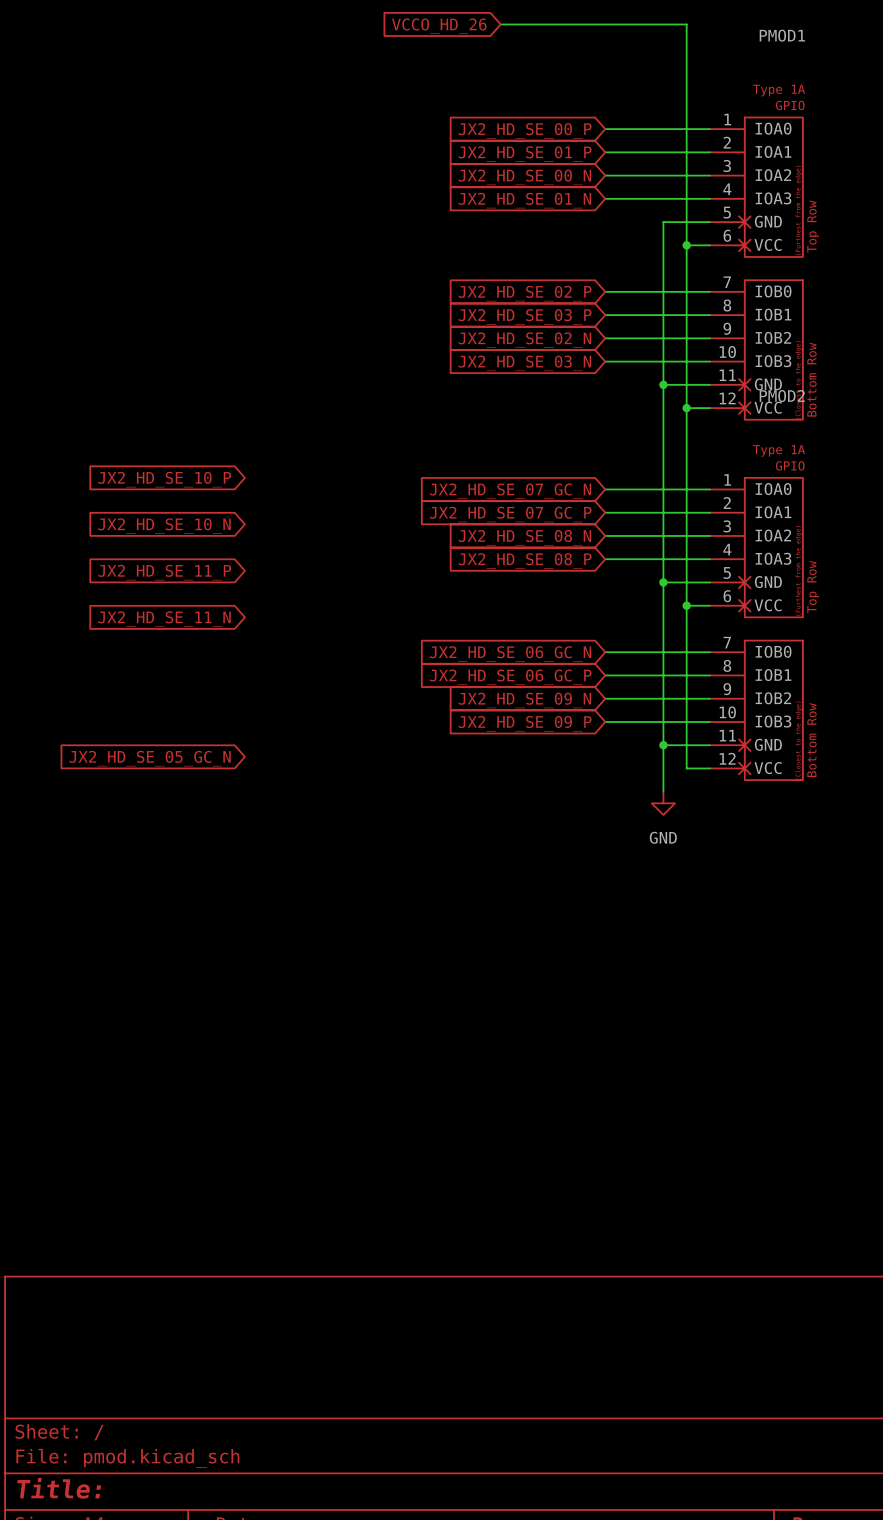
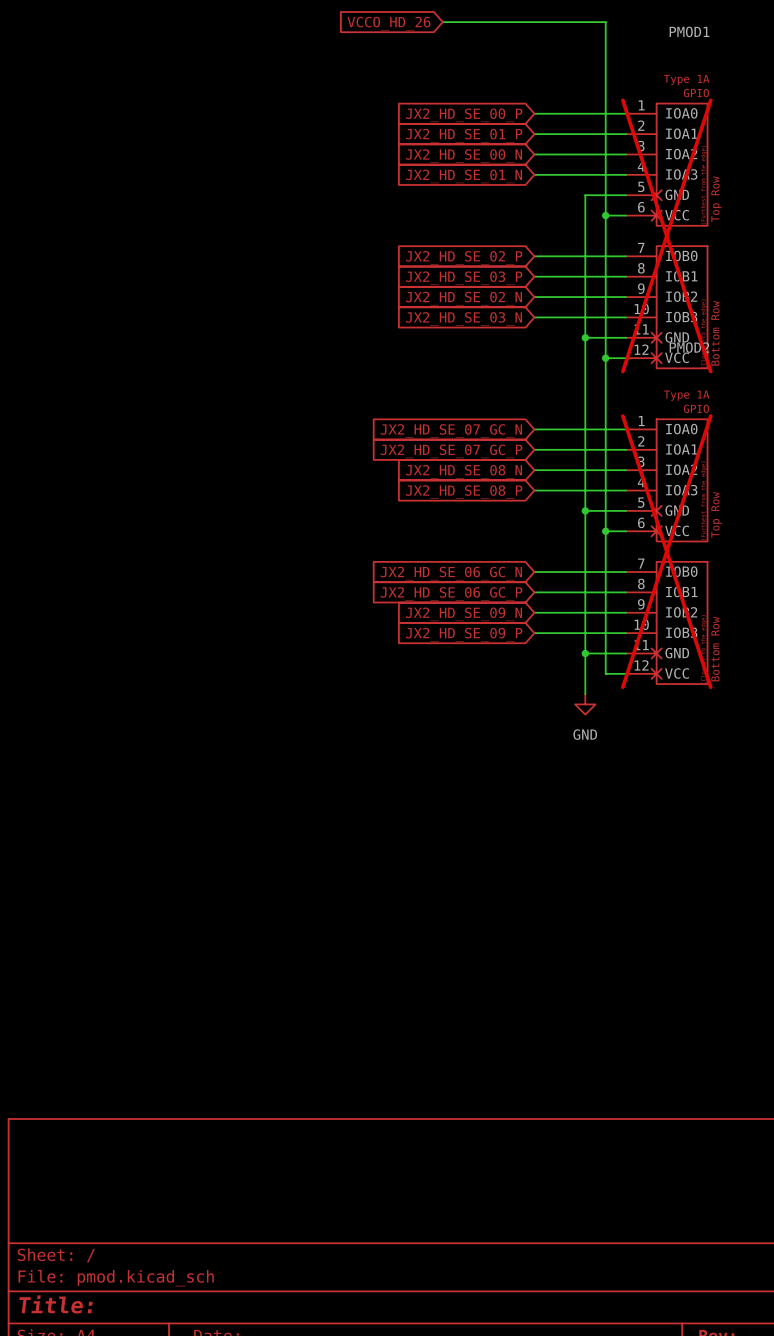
PMOD1 do-not-place cross: none -> (666, 235)
global label: JX2_HD_SE_10_P (164, 479) -> none
global label: JX2_HD_SE_10_N (164, 526) -> none
global label: JX2_HD_SE_11_P (164, 572) -> none
global label: JX2_HD_SE_11_N (164, 619) -> none
PMOD2 do-not-place cross: none -> (666, 551)
global label: JX2_HD_SE_05_GC_N (150, 758) -> none

